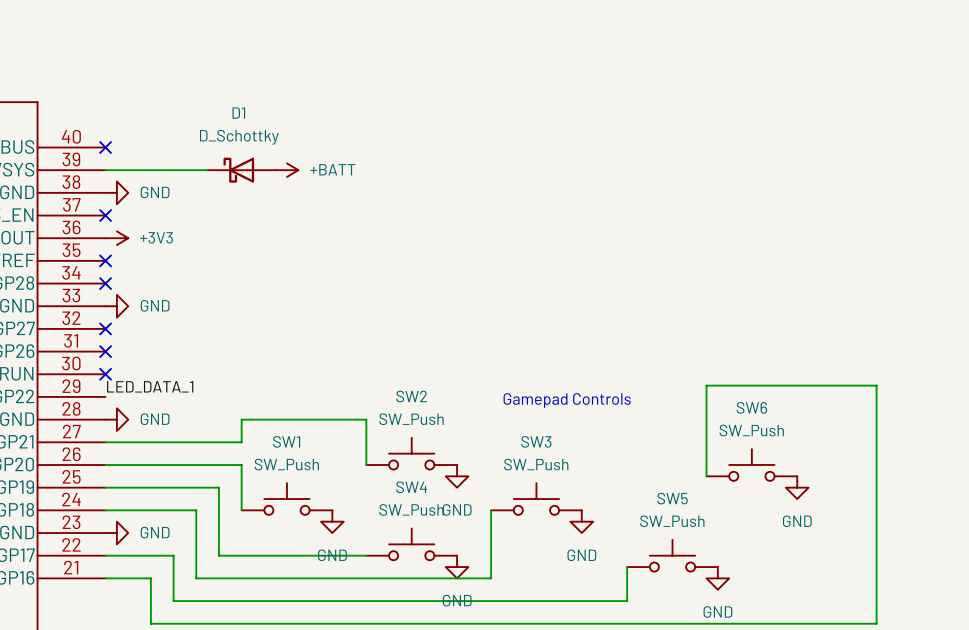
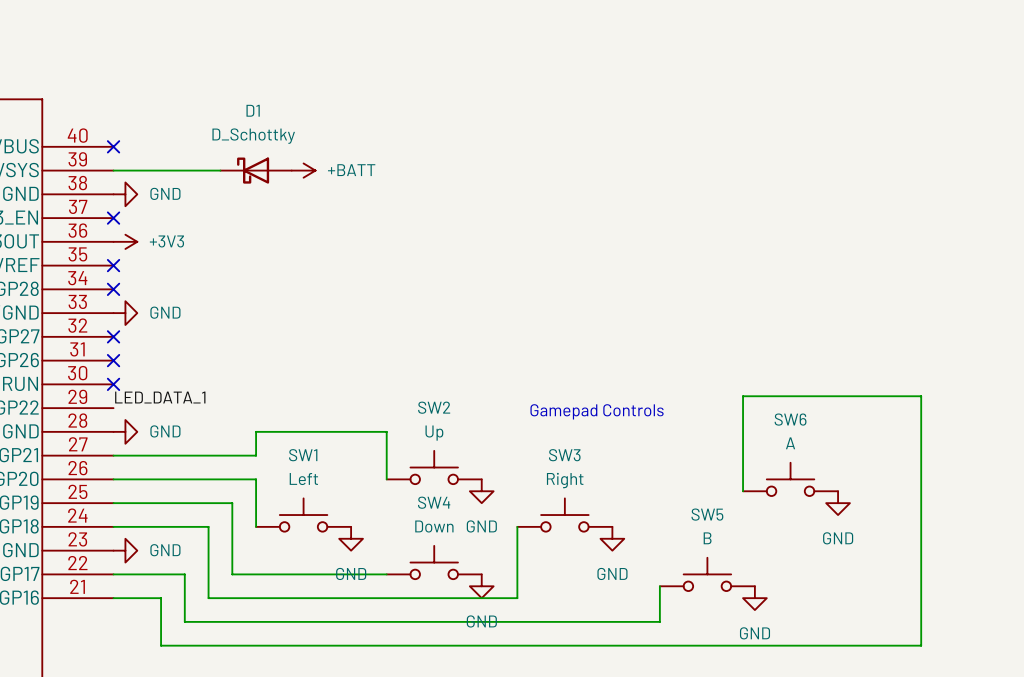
SW2 value: SW_Push (411, 419) -> Up (434, 433)
SW6 value: SW_Push (751, 430) -> A (790, 443)
SW1 value: SW_Push (286, 464) -> Left (303, 479)
SW3 value: SW_Push (536, 464) -> Right (565, 480)
SW4 value: SW_Push (411, 509) -> Down (434, 526)
SW5 value: SW_Push (672, 521) -> B (707, 538)

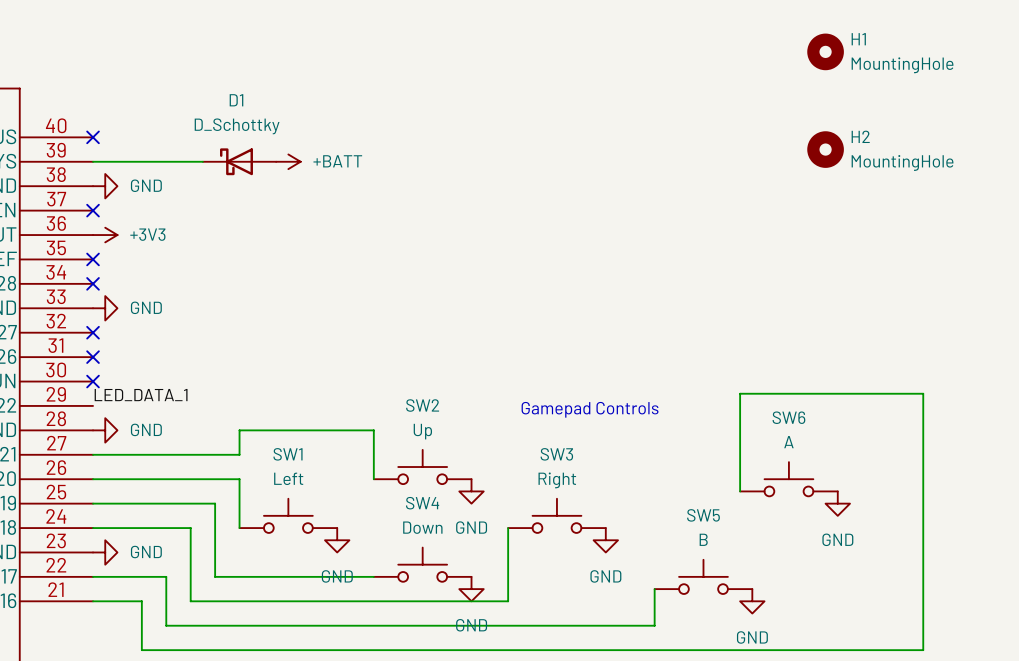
H1: none -> MountingHole (825, 51)
H2: none -> MountingHole (825, 149)

